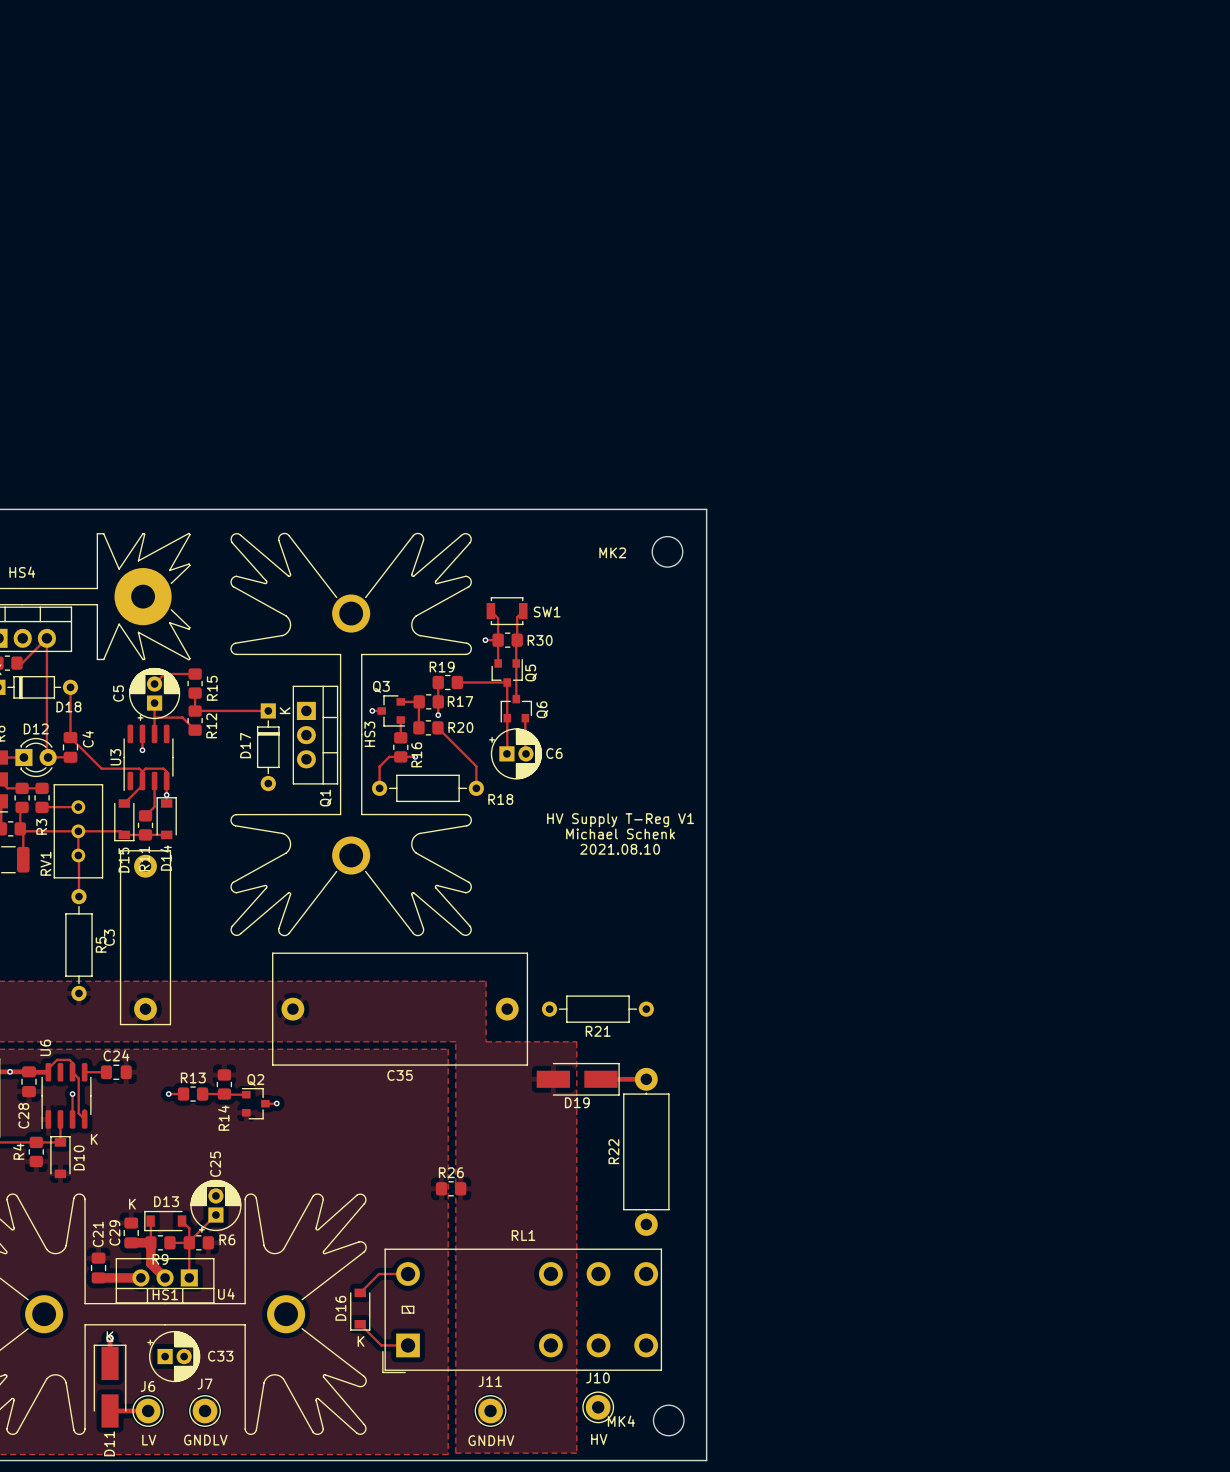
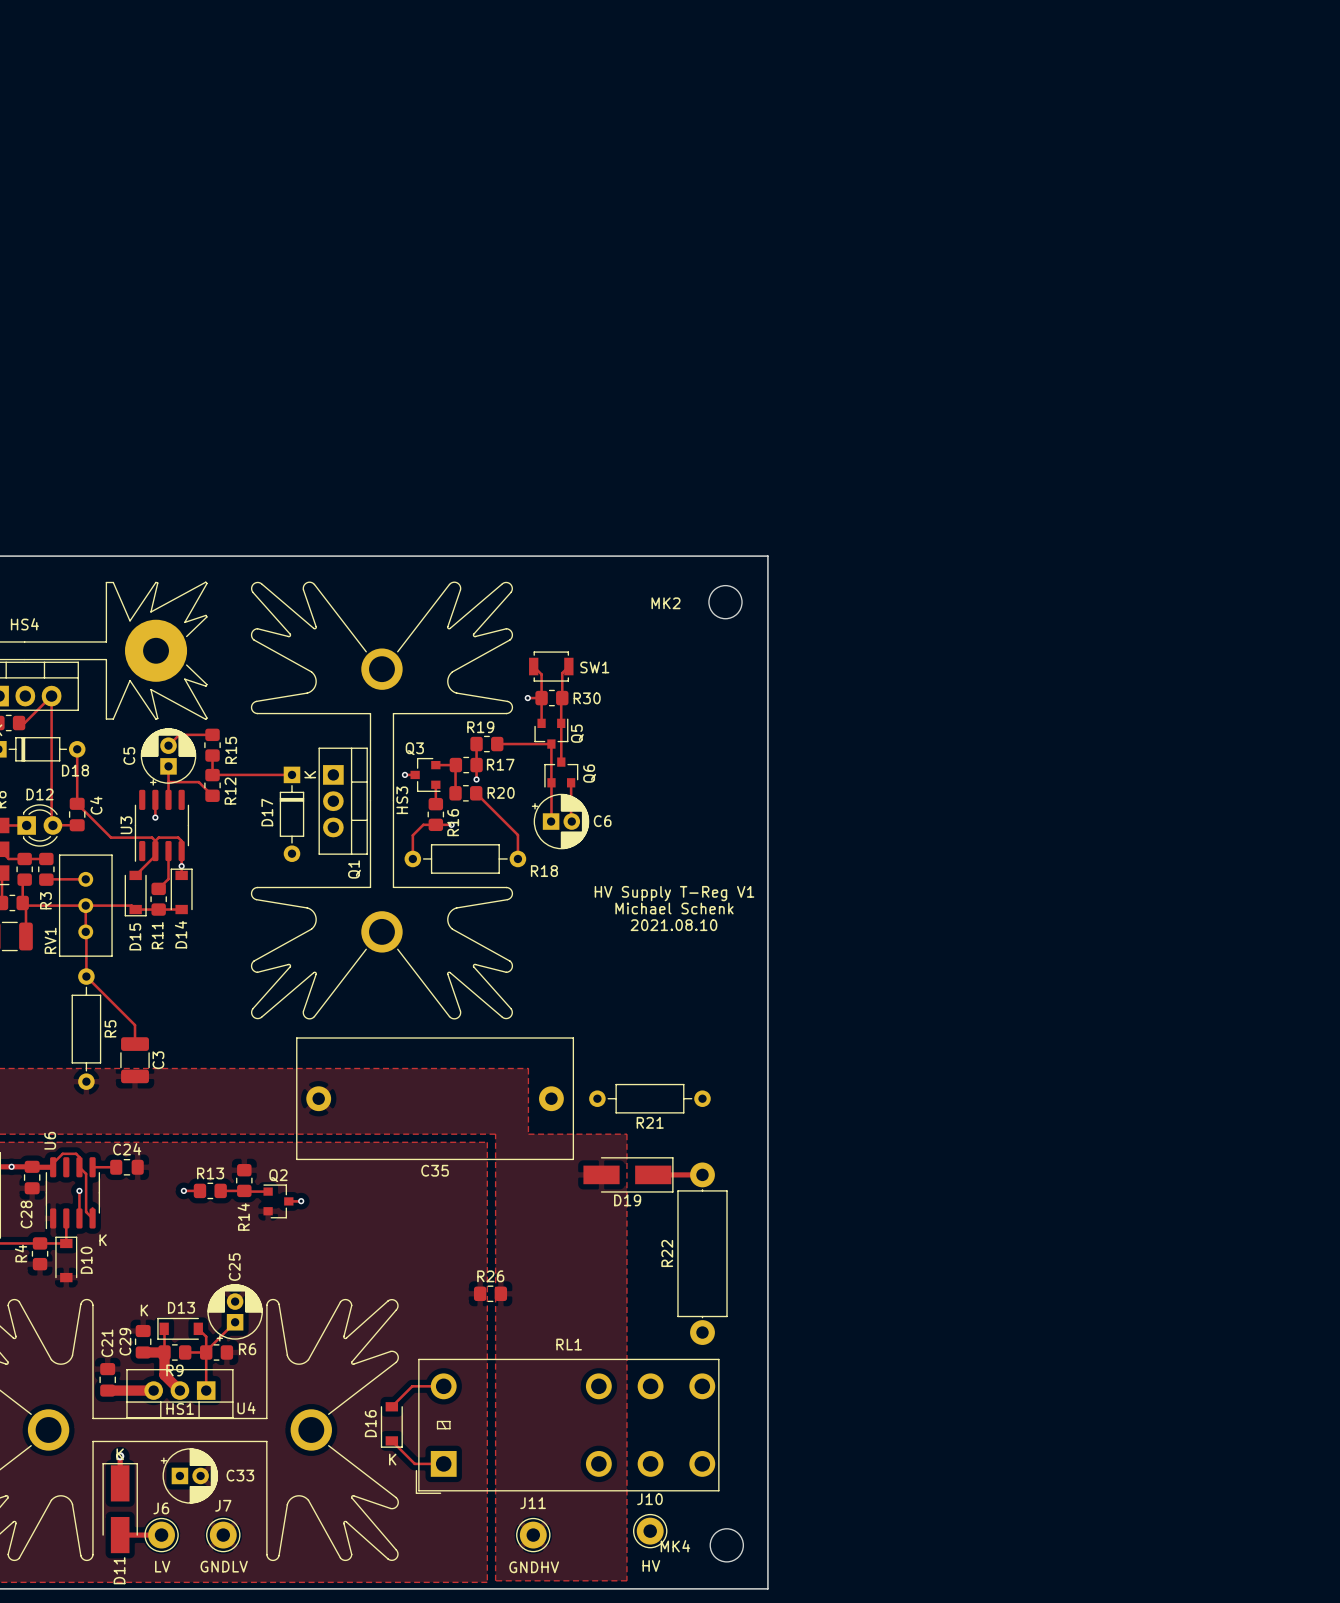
C3 footprint: [119, 850, 172, 1026] -> [120, 1037, 150, 1084]
track: none -> (86, 976) (135, 1025) (135, 1044)
C3 name position: C3 (109, 937) -> C3 (158, 1060)

